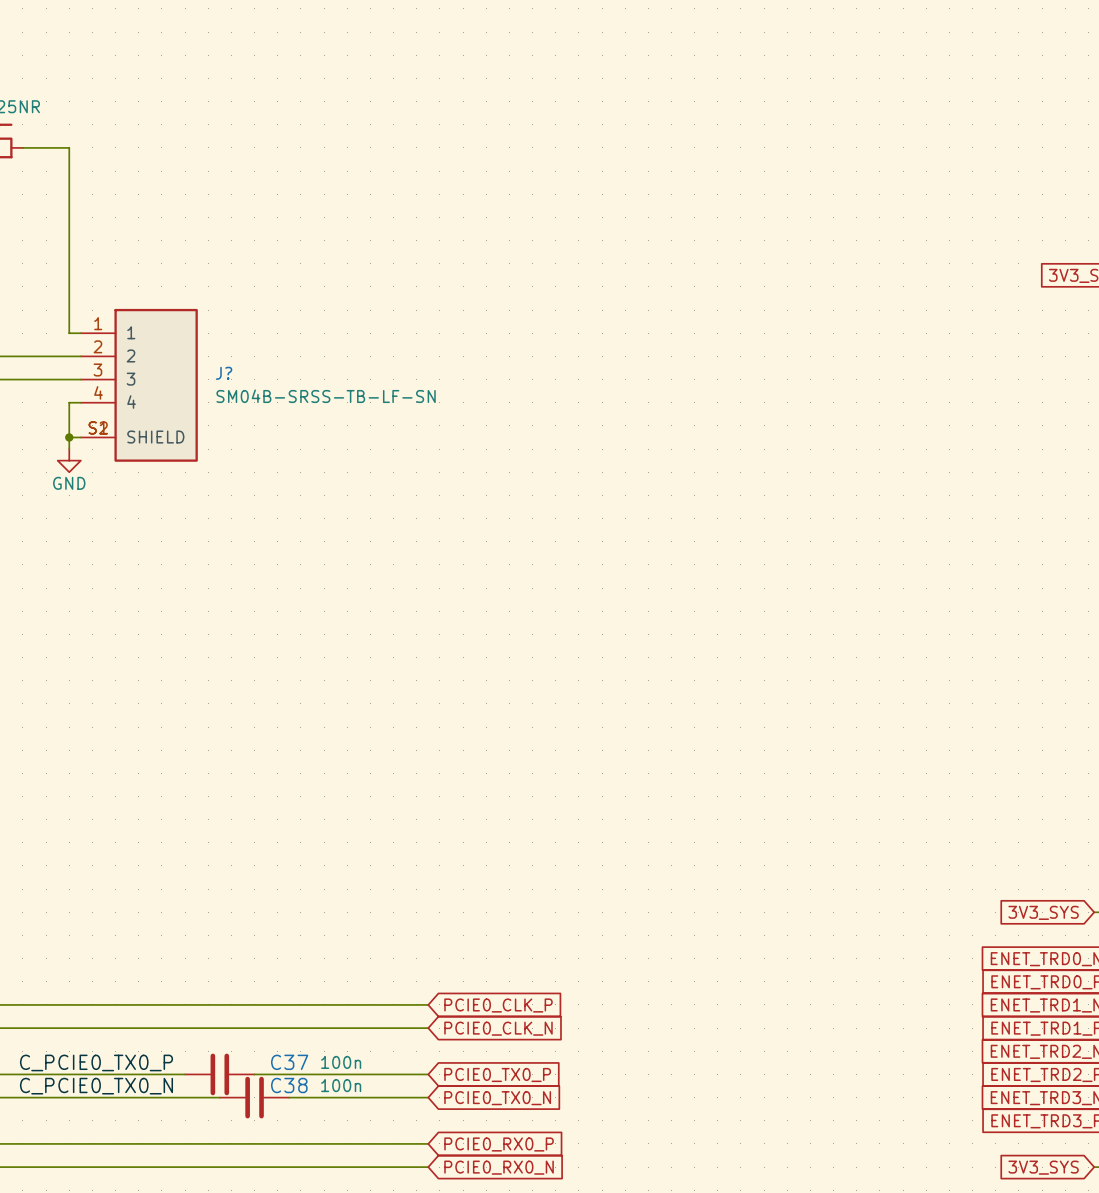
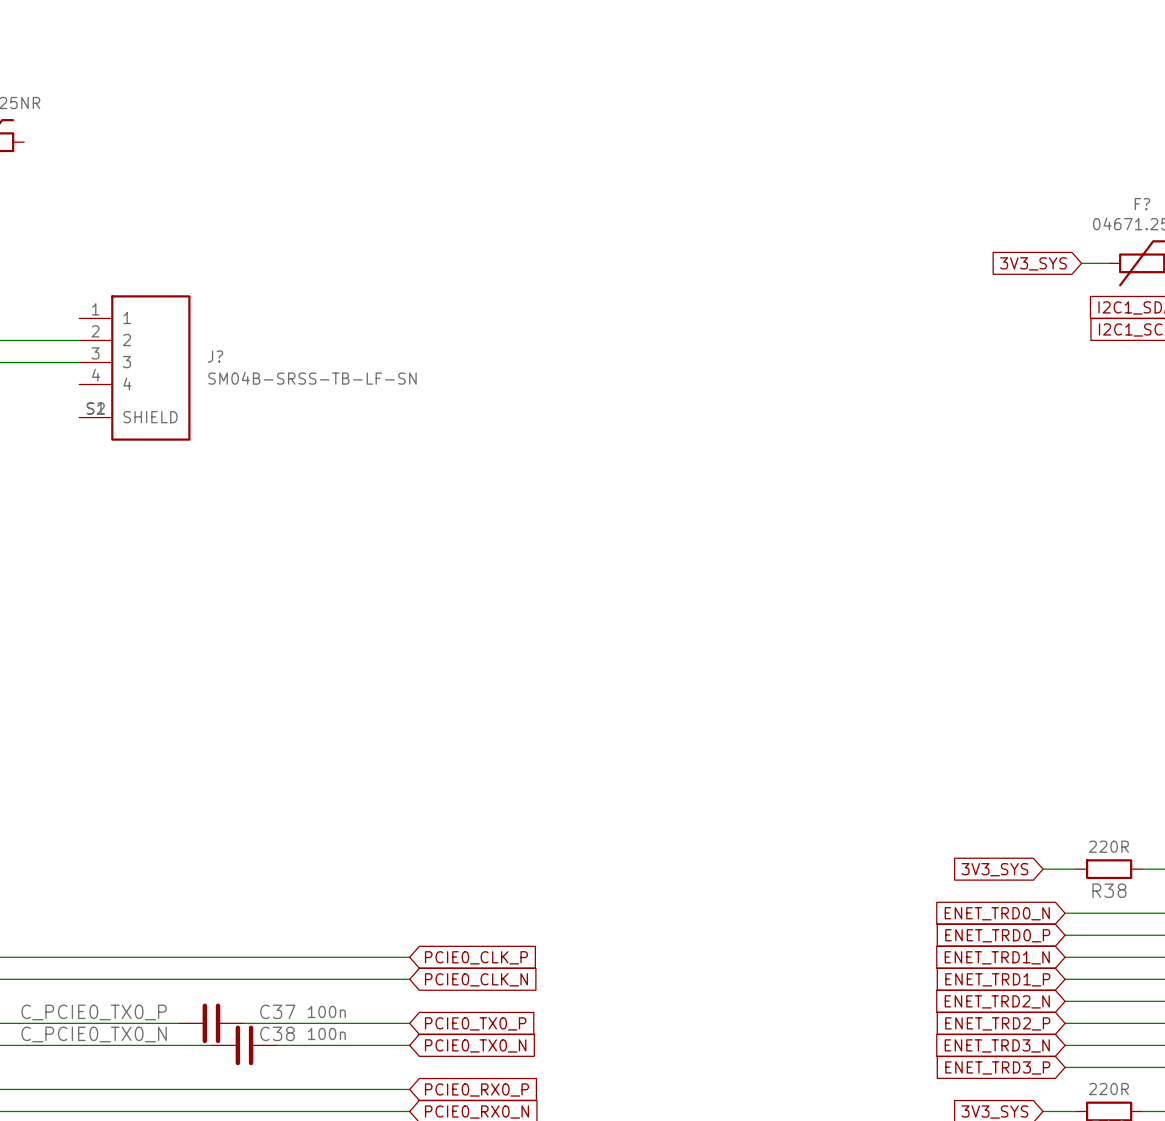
wire: (22, 147) (69, 147) (69, 333) (80, 333) -> none
wire: (80, 402) (69, 402) (69, 449) -> none
wire: (69, 437) (80, 437) -> none
junction: (69, 437) -> none
power symbol: GND (69, 460) -> none

